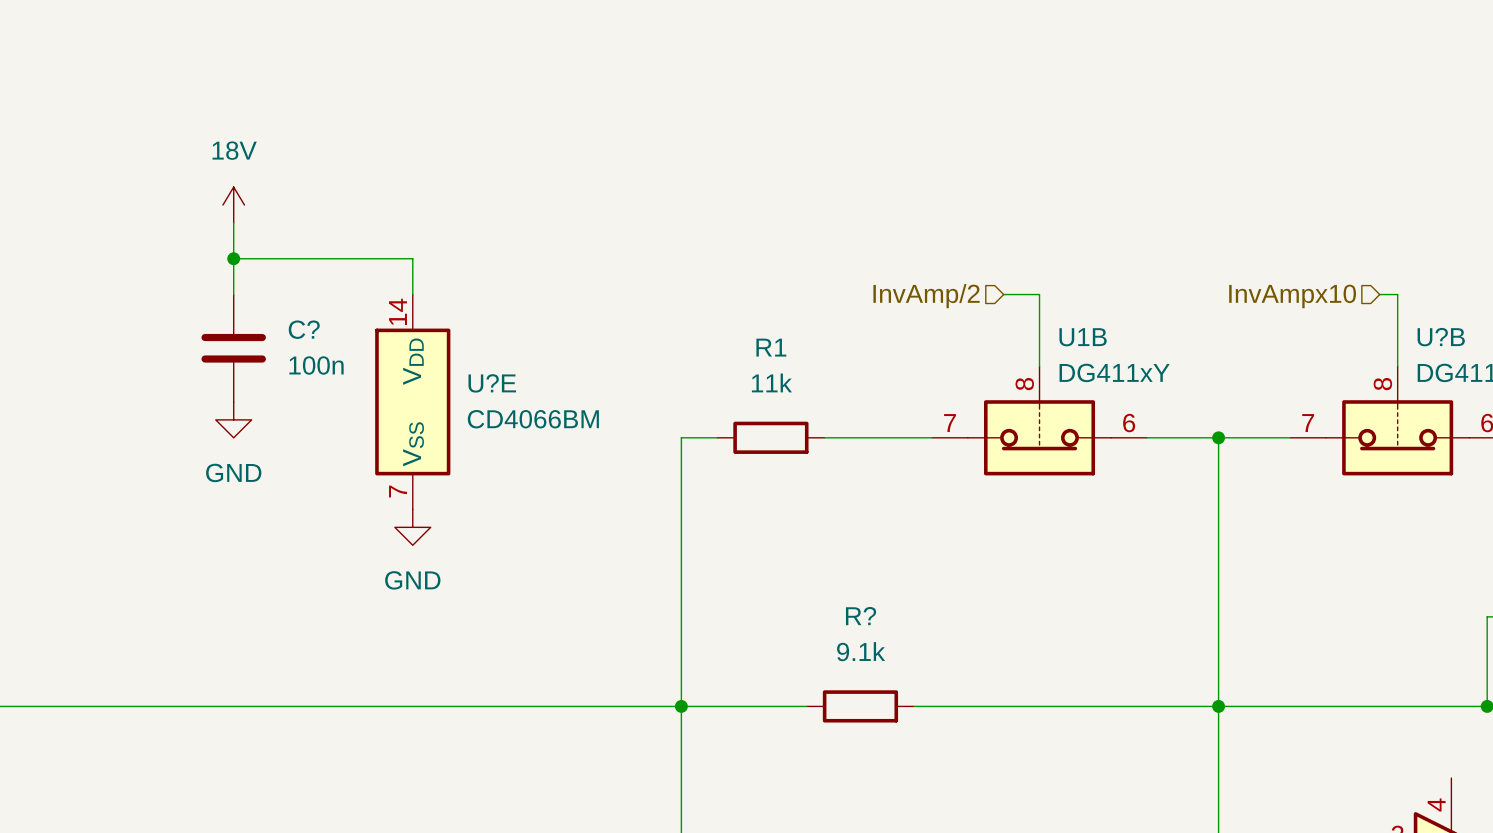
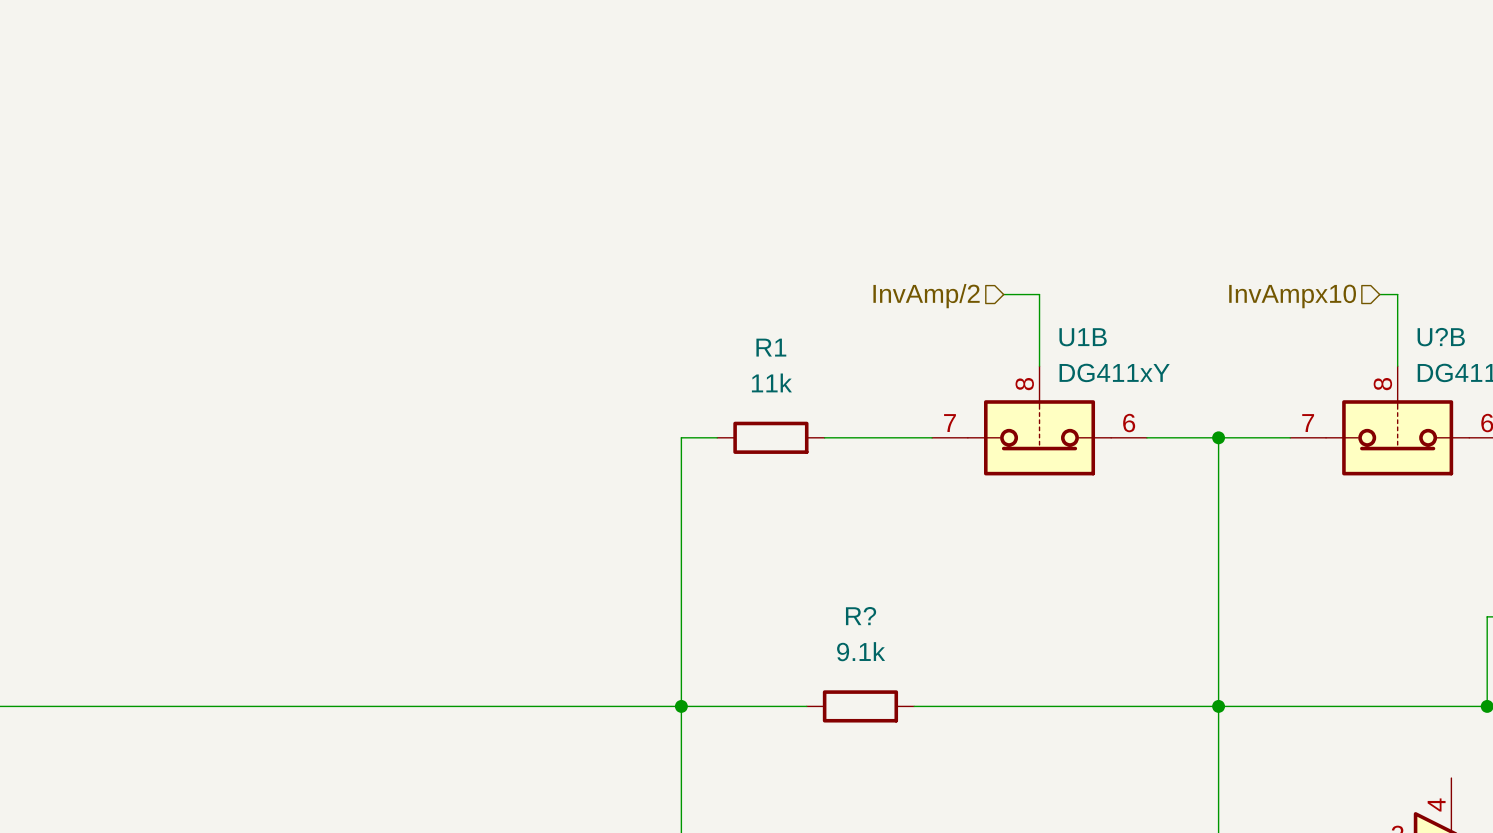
power symbol: 18V (233, 205) -> none
wire: (233, 222) (233, 294) -> none
wire: (233, 258) (412, 258) (412, 294) -> none
junction: (233, 258) -> none
C?: 100n (233, 348) -> none
U?E: CD4066BM (412, 401) -> none
power symbol: GND (233, 419) -> none
power symbol: GND (412, 527) -> none

